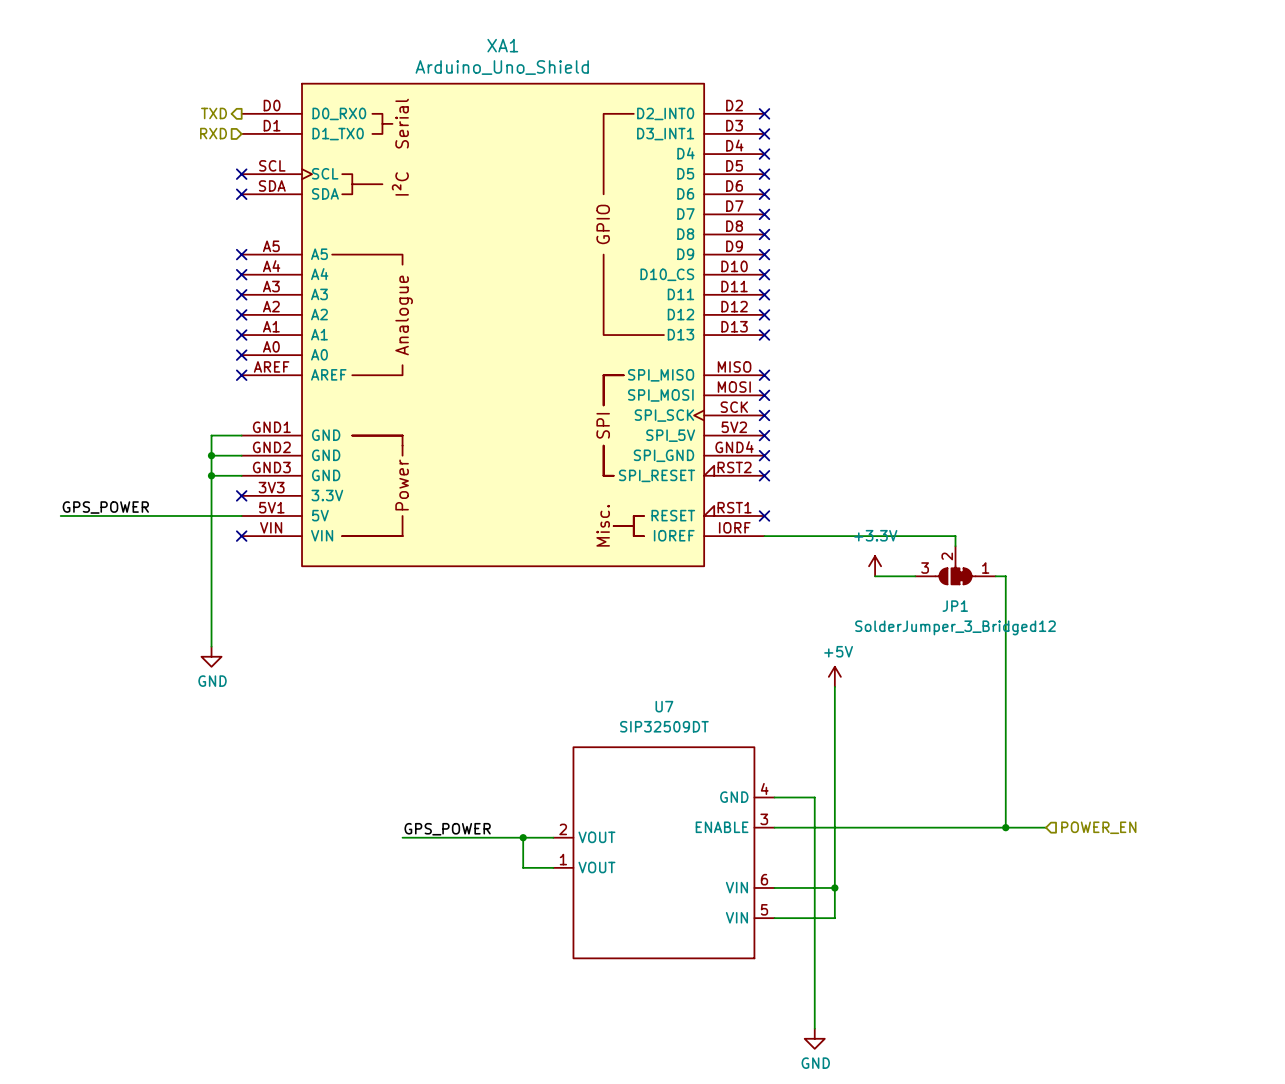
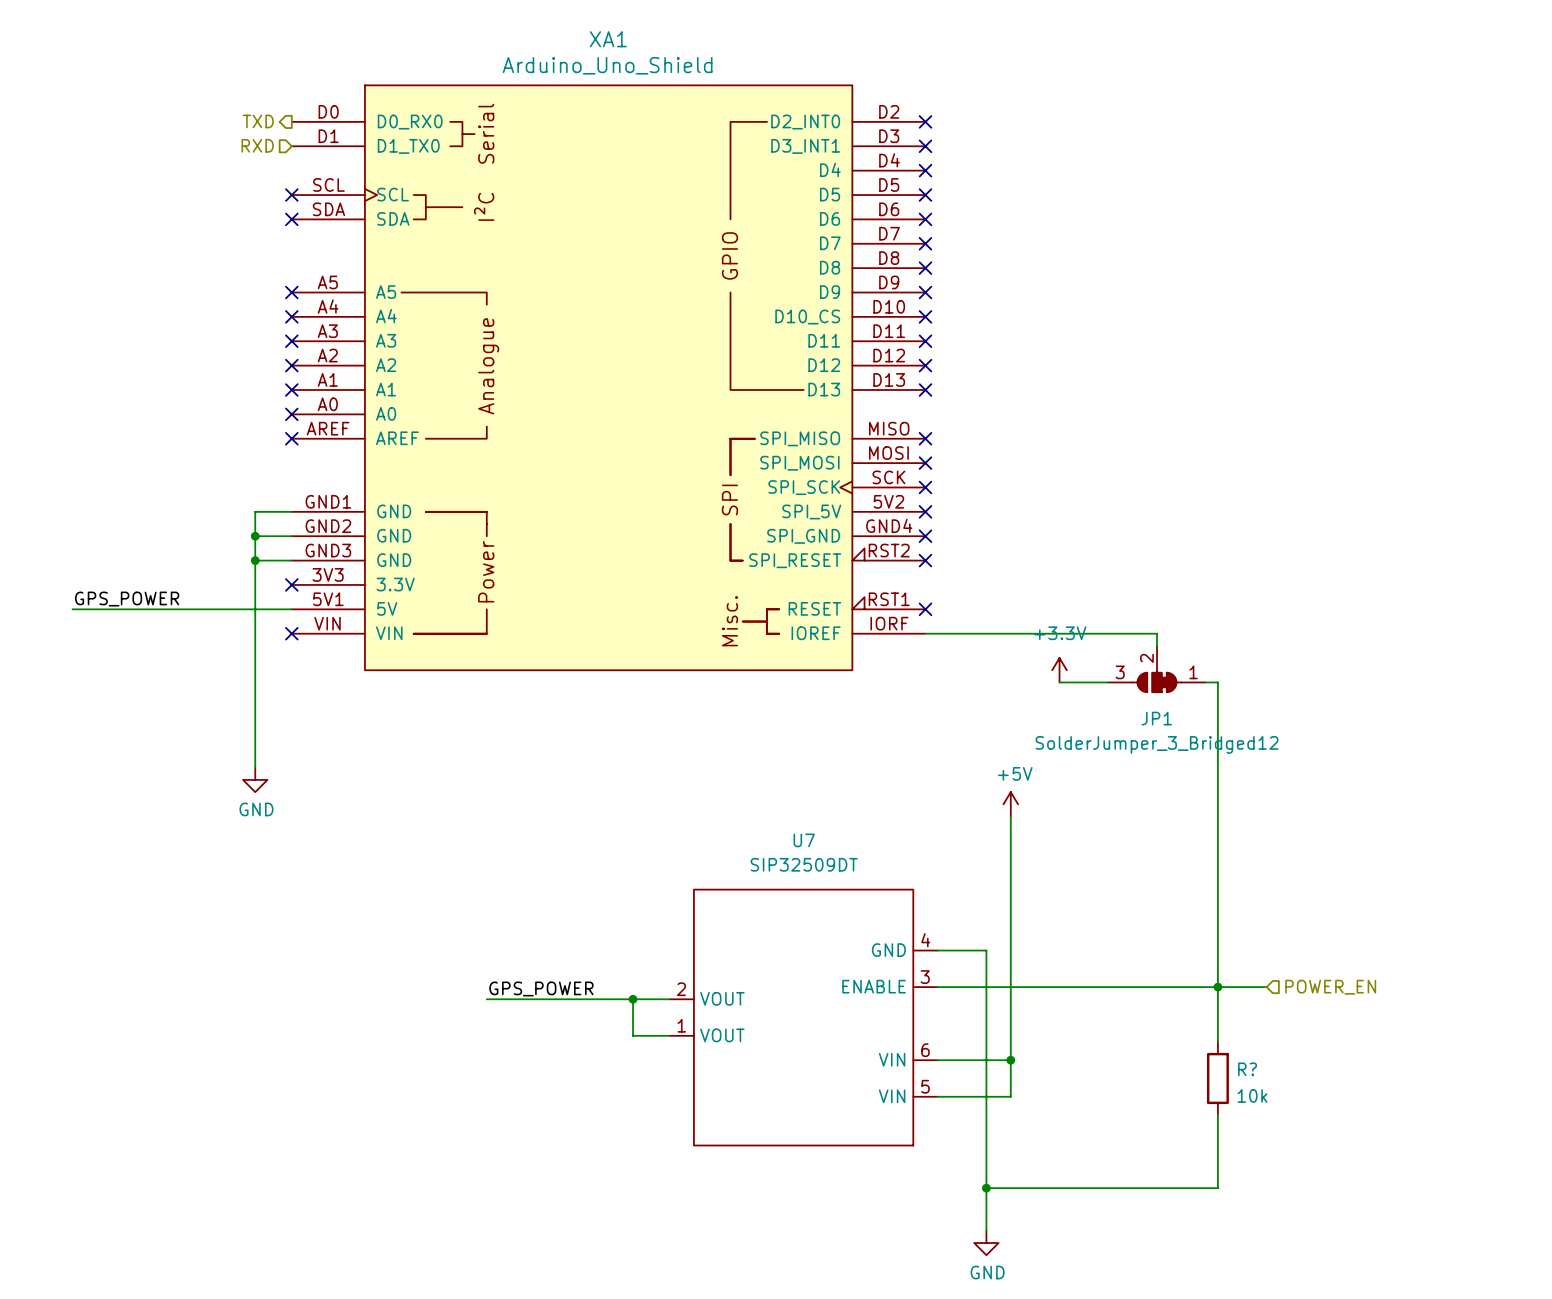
wire: none -> (1217, 987) (1217, 1041)
R?: none -> 10k (1217, 1078)
wire: none -> (1217, 1115) (1217, 1188) (986, 1188)
junction: none -> (986, 1188)

